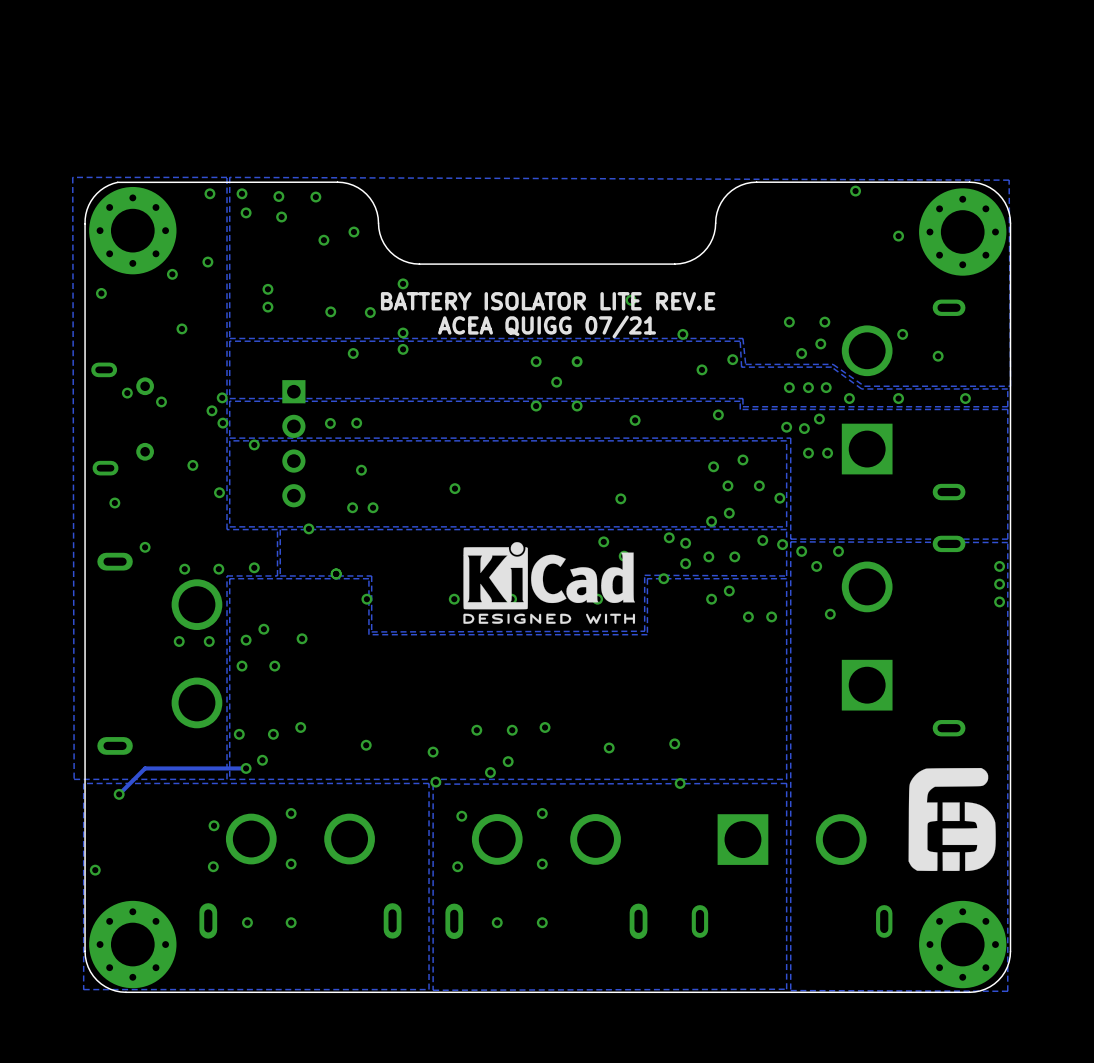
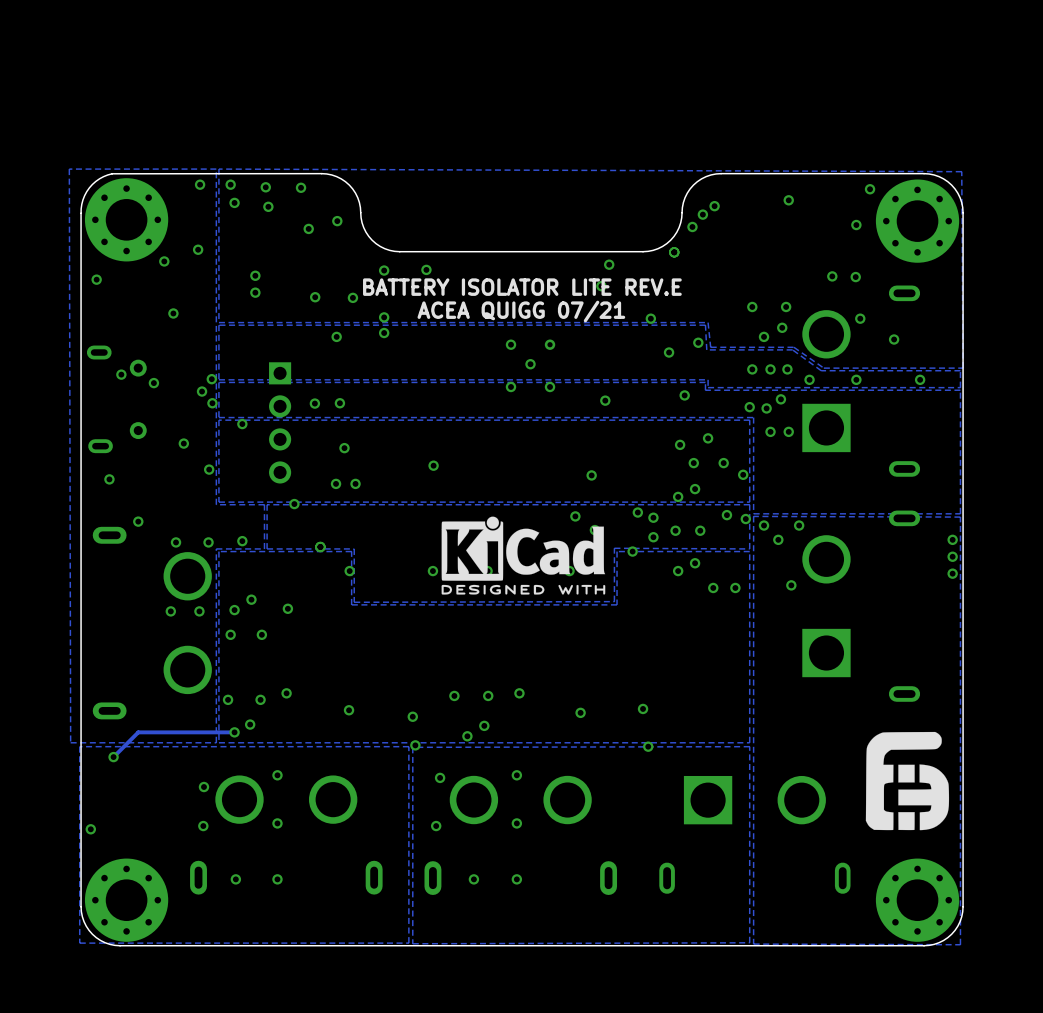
via: (855, 191) -> none
via: none -> (870, 189)
via: none -> (788, 200)
via: none -> (714, 206)
via: none -> (702, 214)
via: none -> (692, 226)
via: none -> (674, 252)
via: none -> (609, 264)
via: none -> (426, 269)
via: none -> (832, 276)
via: none -> (855, 277)

